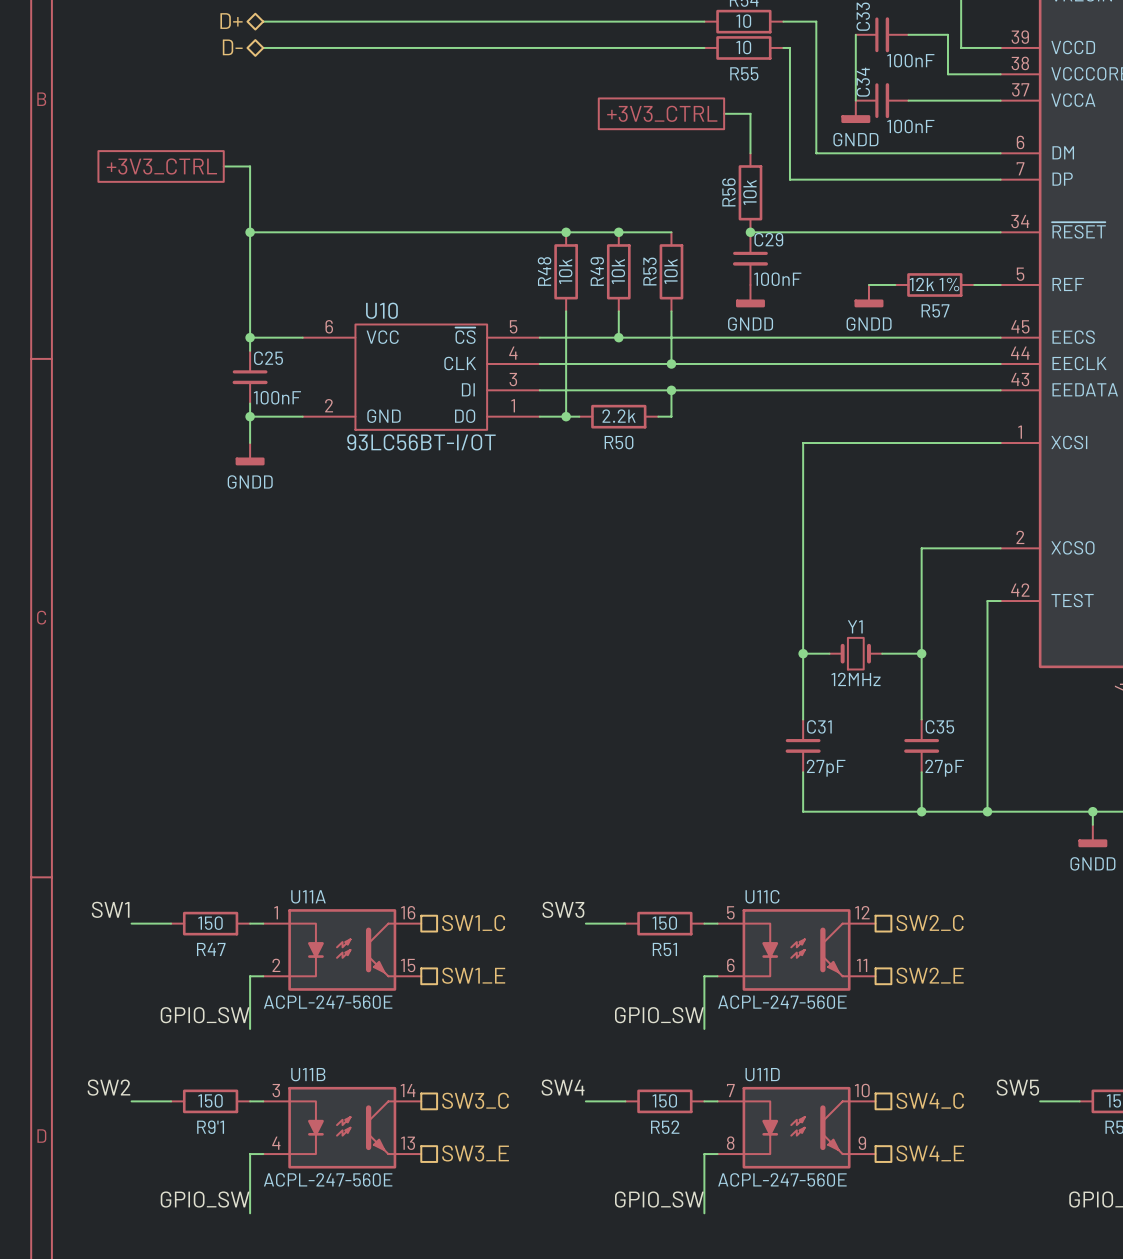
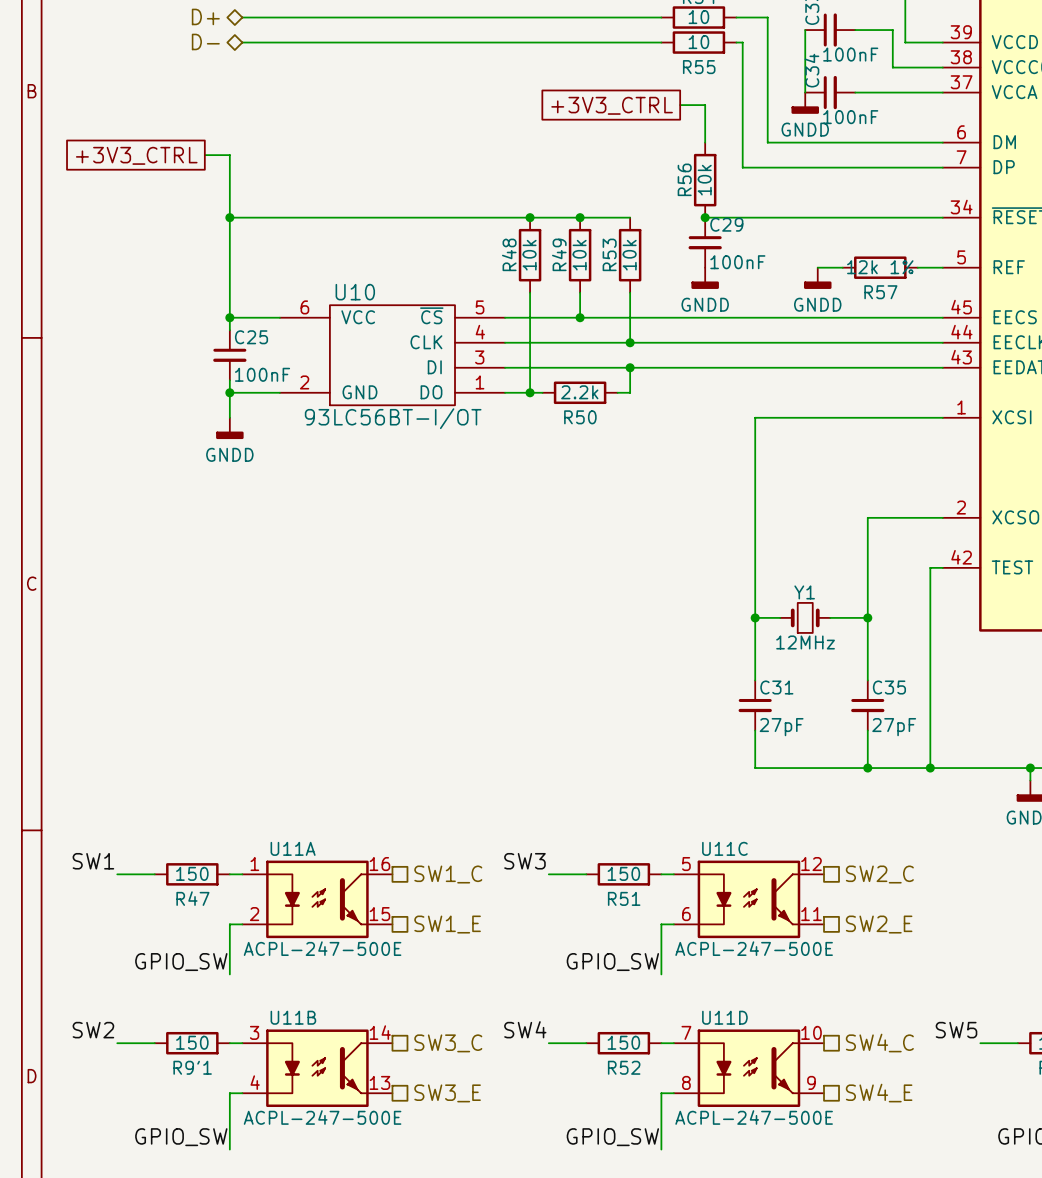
U11A value: ACPL-247-560E (328, 1002) -> ACPL-247-500E (322, 948)
U11C value: ACPL-247-560E (782, 1002) -> ACPL-247-500E (754, 948)
U11B value: ACPL-247-560E (328, 1179) -> ACPL-247-500E (322, 1117)
U11D value: ACPL-247-560E (782, 1179) -> ACPL-247-500E (754, 1117)

